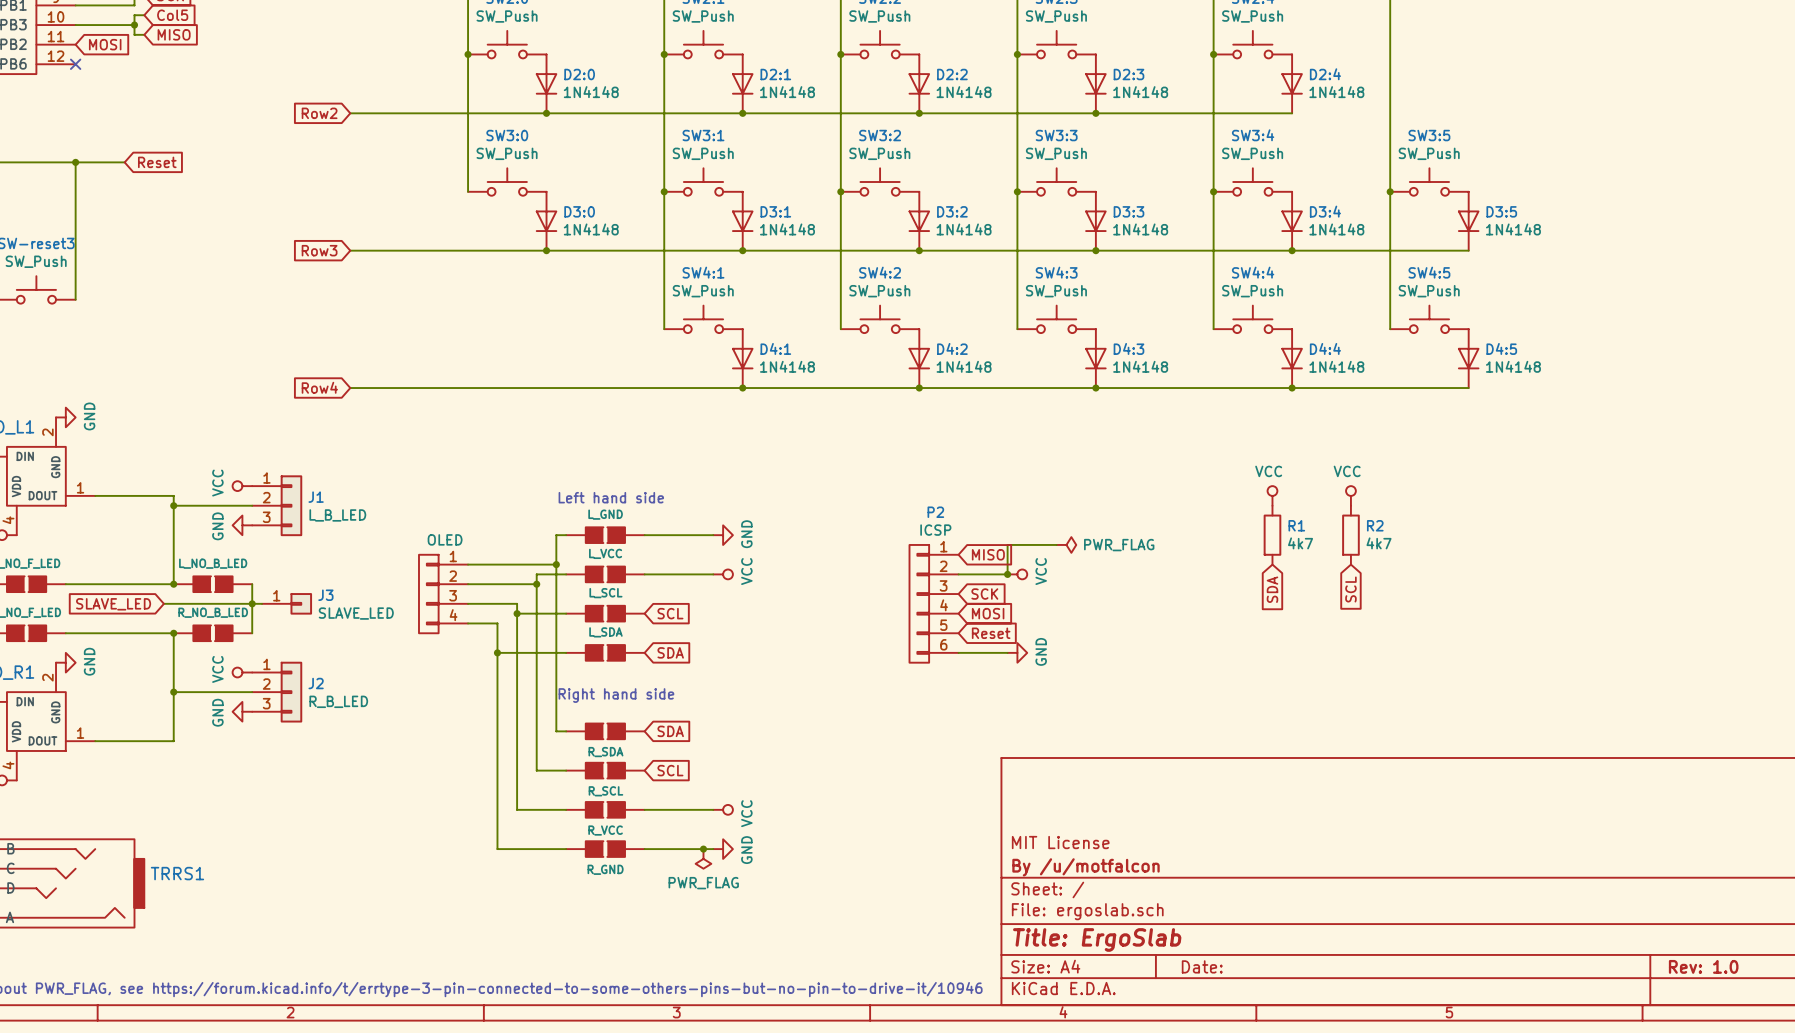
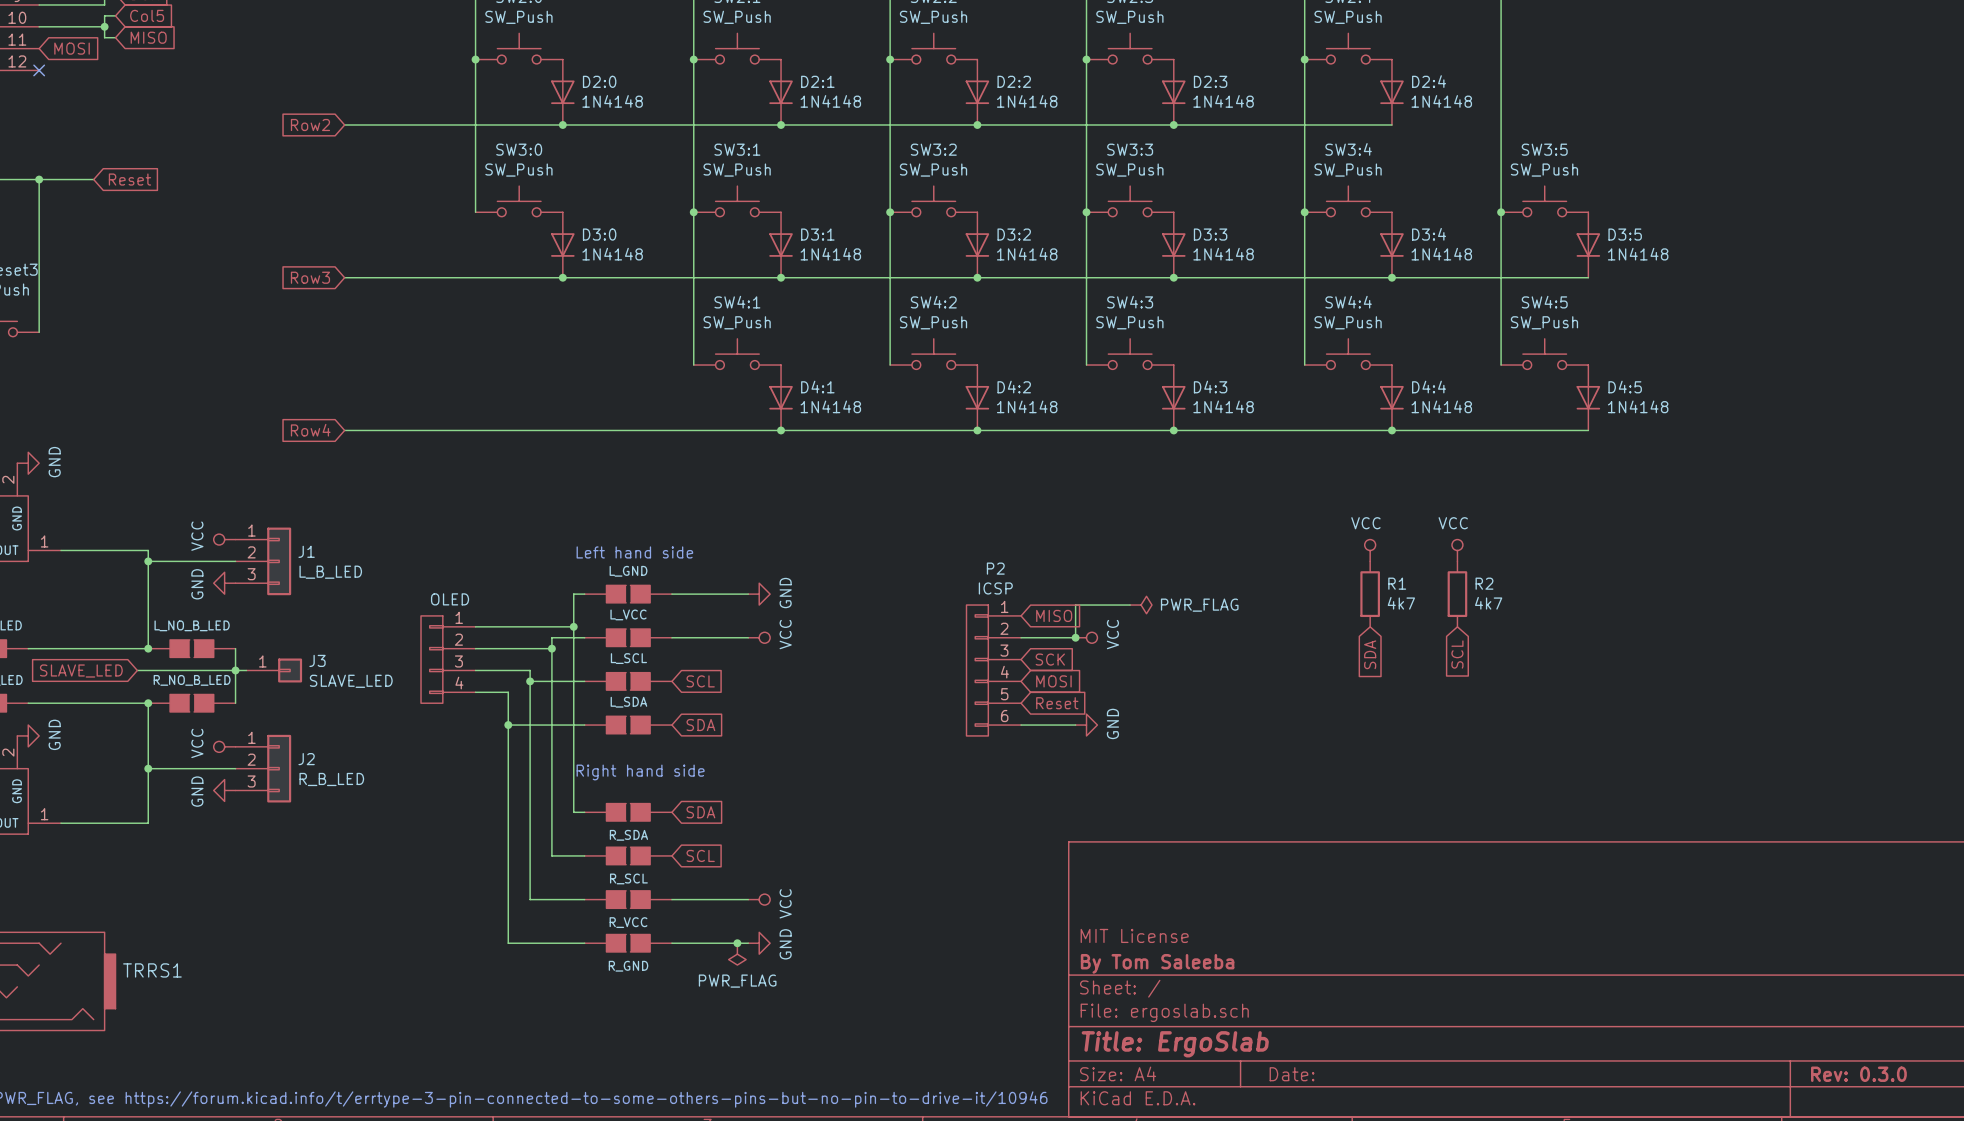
title block: By /u/motfalcon (1086, 867) -> By Tom Saleeba (1157, 963)
title block: Rev: 1.0 (1703, 966) -> Rev: 0.3.0 (1858, 1074)

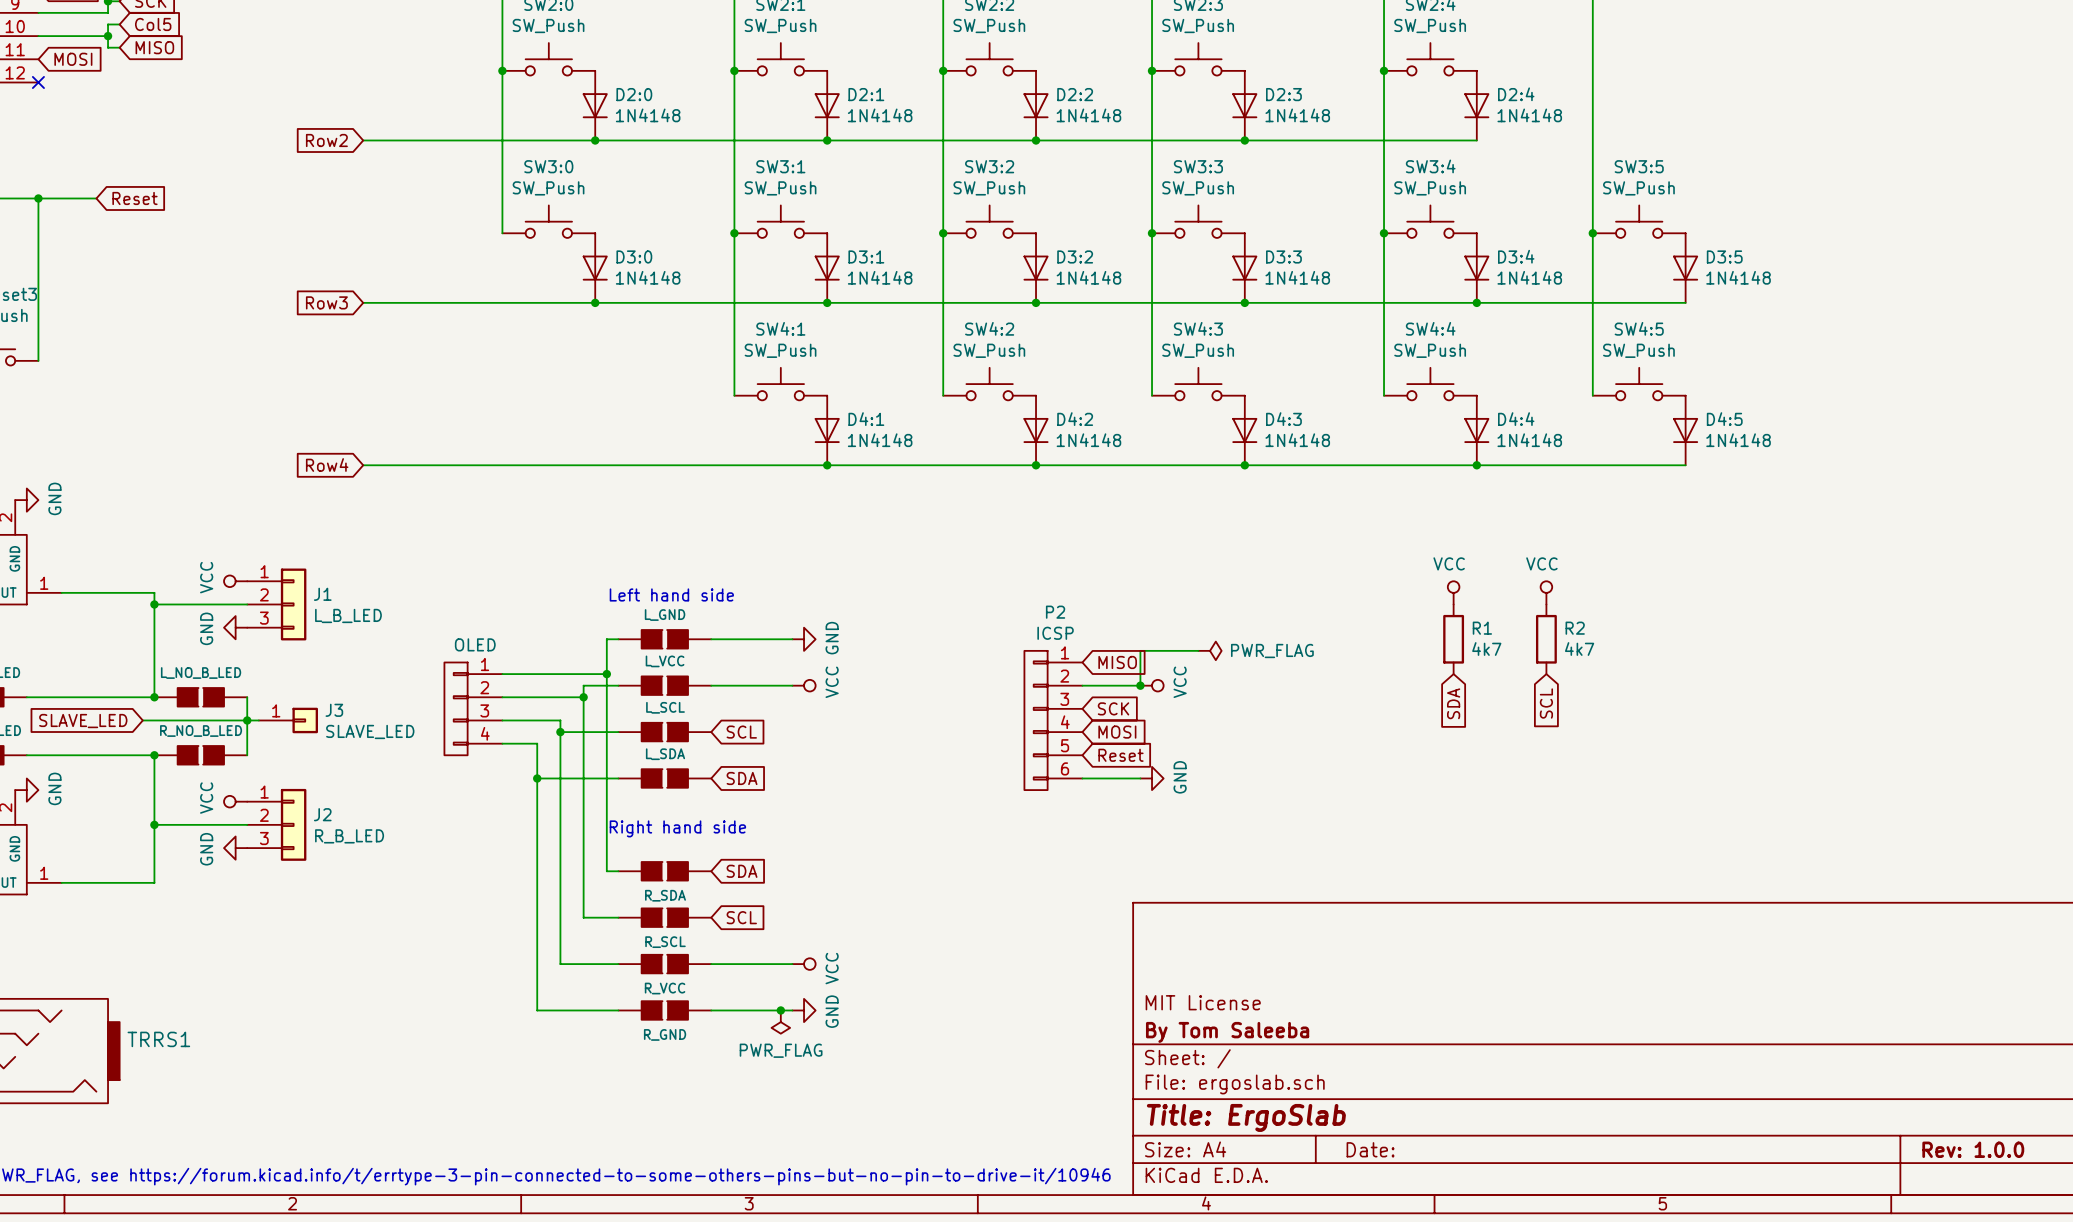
title block: Rev: 0.3.0 (1858, 1074) -> Rev: 1.0.0 (1973, 1149)

